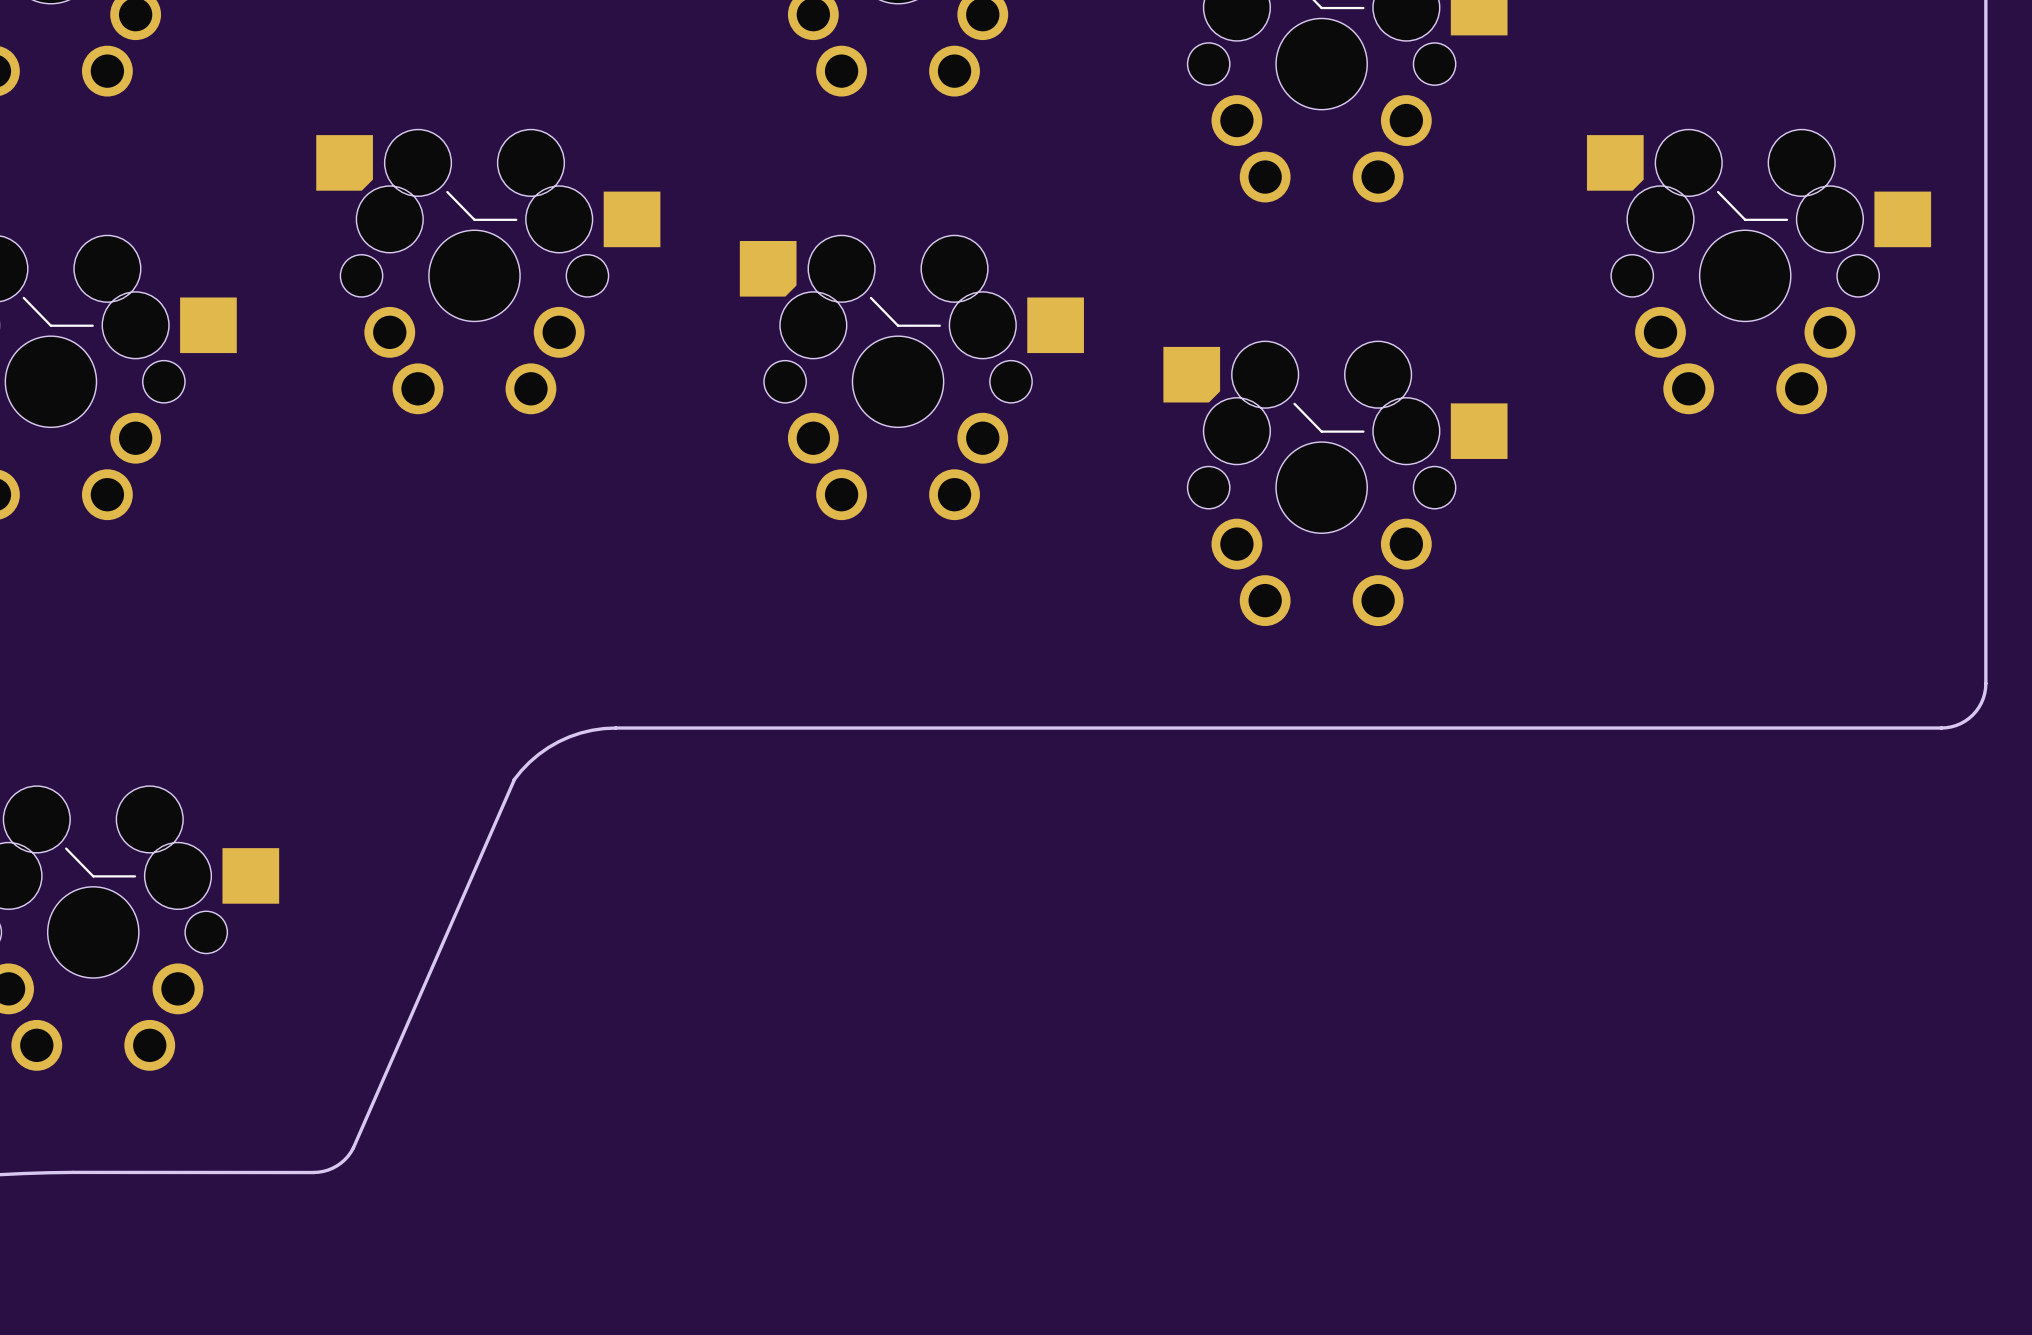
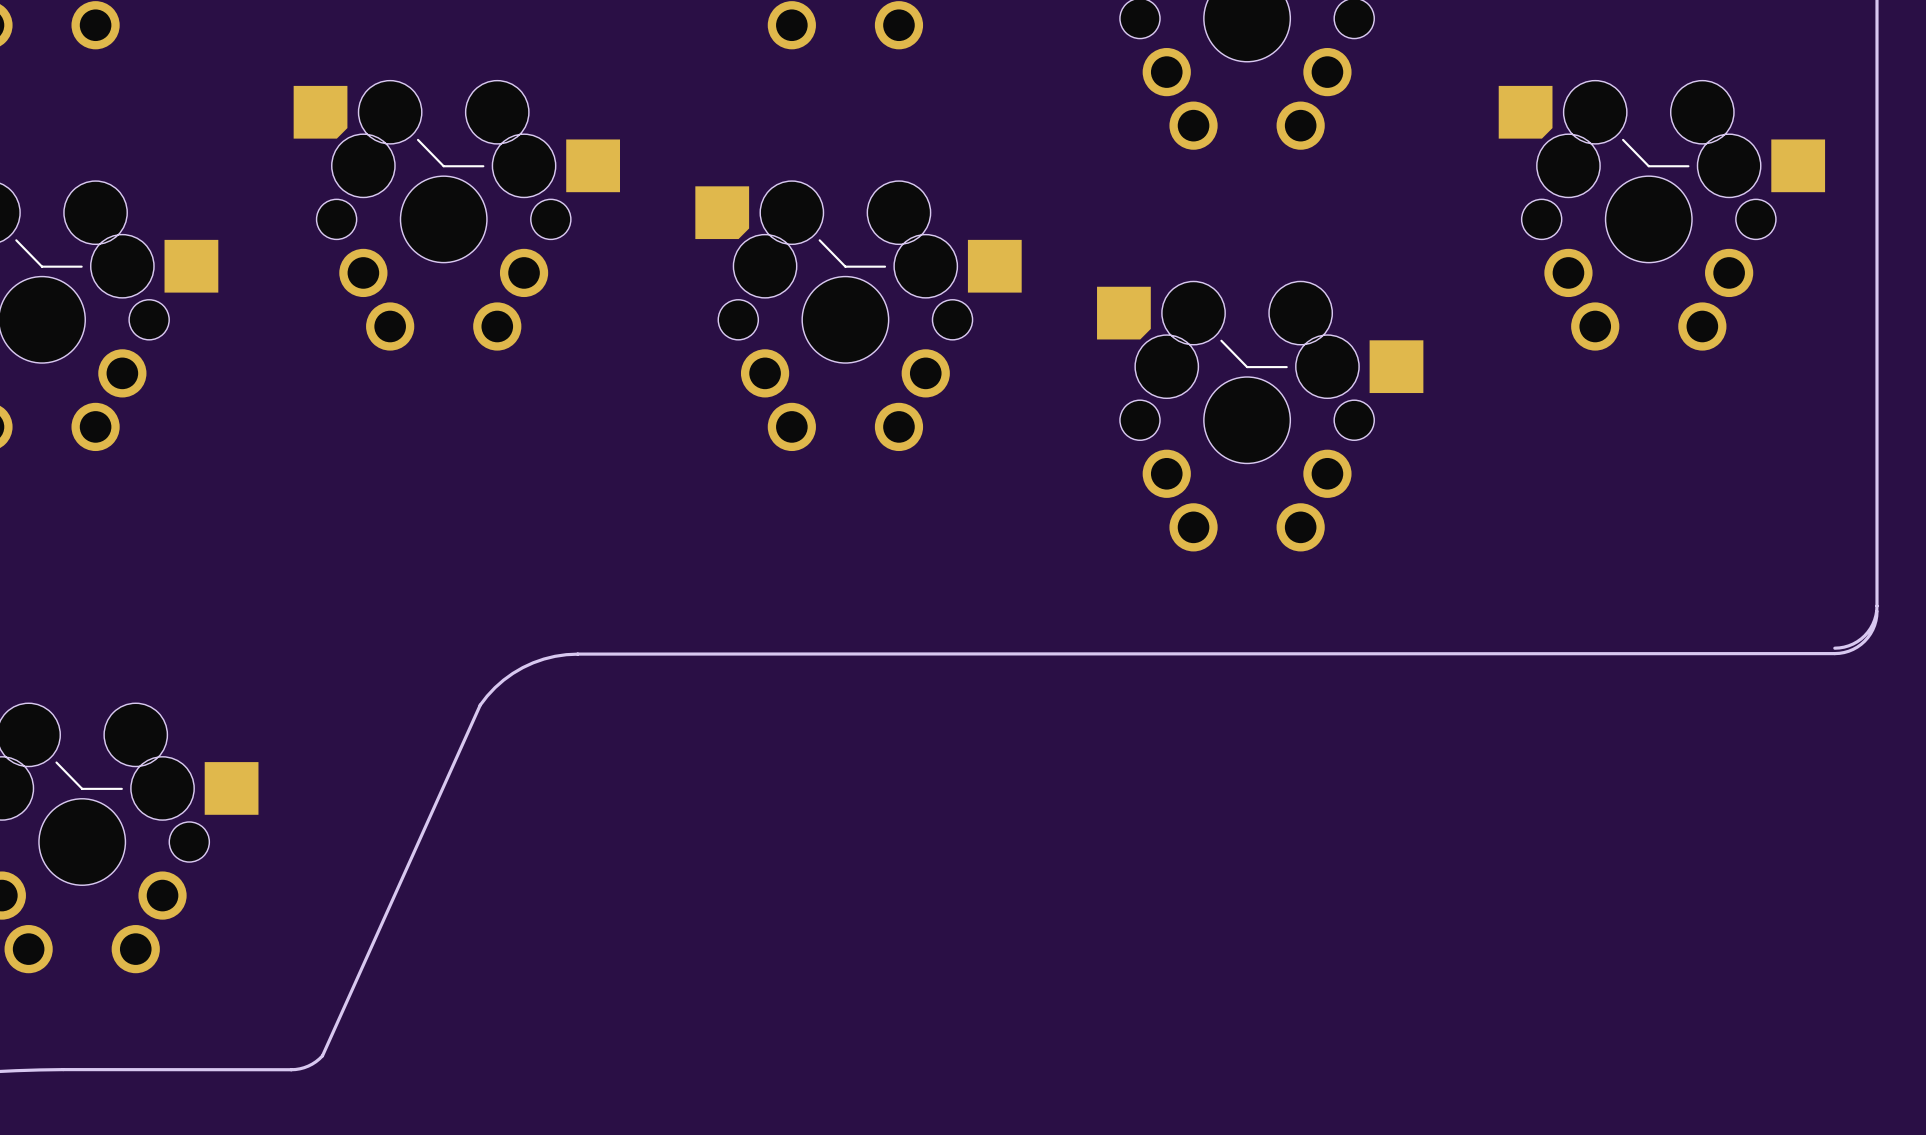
board edge: (1941, 728) (615, 728) (580, 733) (558, 741) (538, 754) (514, 779) -> none
board edge: (514, 780) (353, 1148) (348, 1156) (337, 1165) (323, 1171) (313, 1172) -> (1877, 611) (1874, 625) (1864, 641) (1853, 649) (1834, 653) (577, 654) (543, 659) (522, 667) (503, 680) (480, 705) (322, 1055) (308, 1066) (291, 1069)

